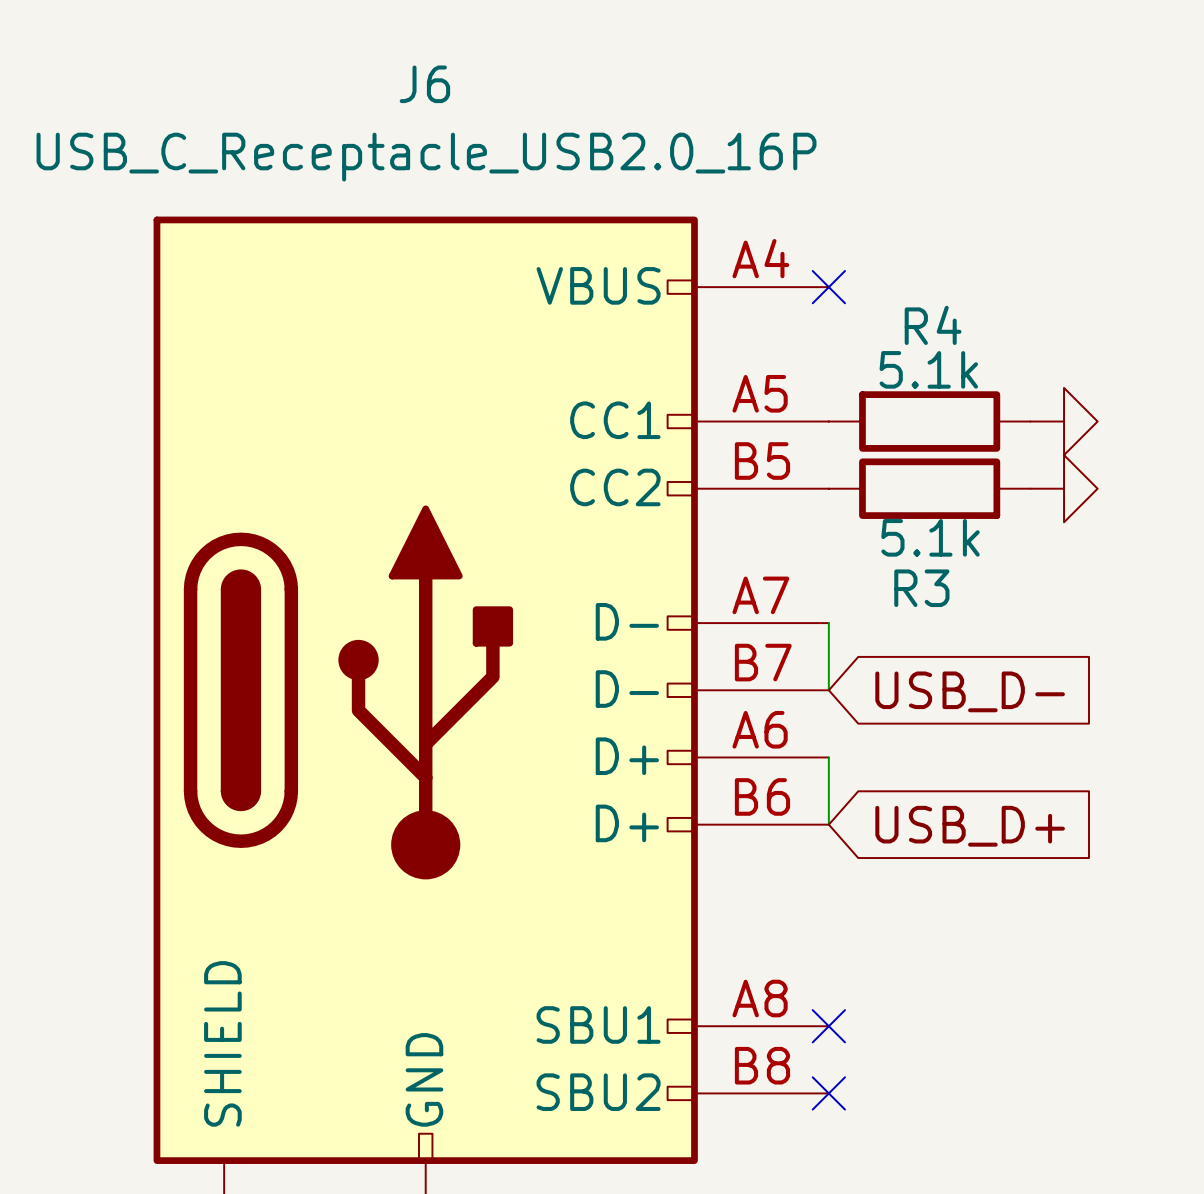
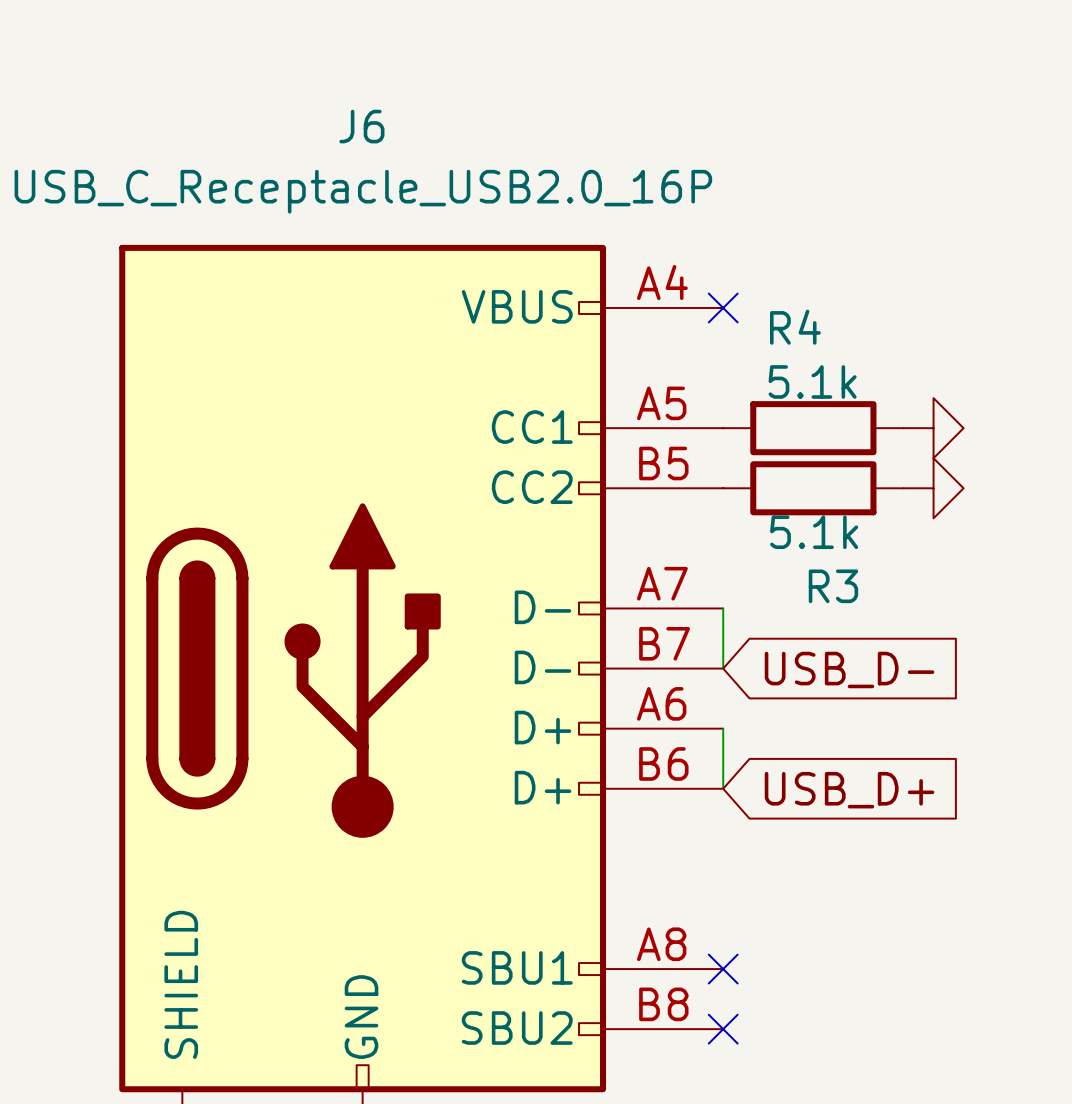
R4 name position: R4 (933, 325) -> R4 (795, 327)
R3 name position: R3 (921, 588) -> R3 (833, 586)

